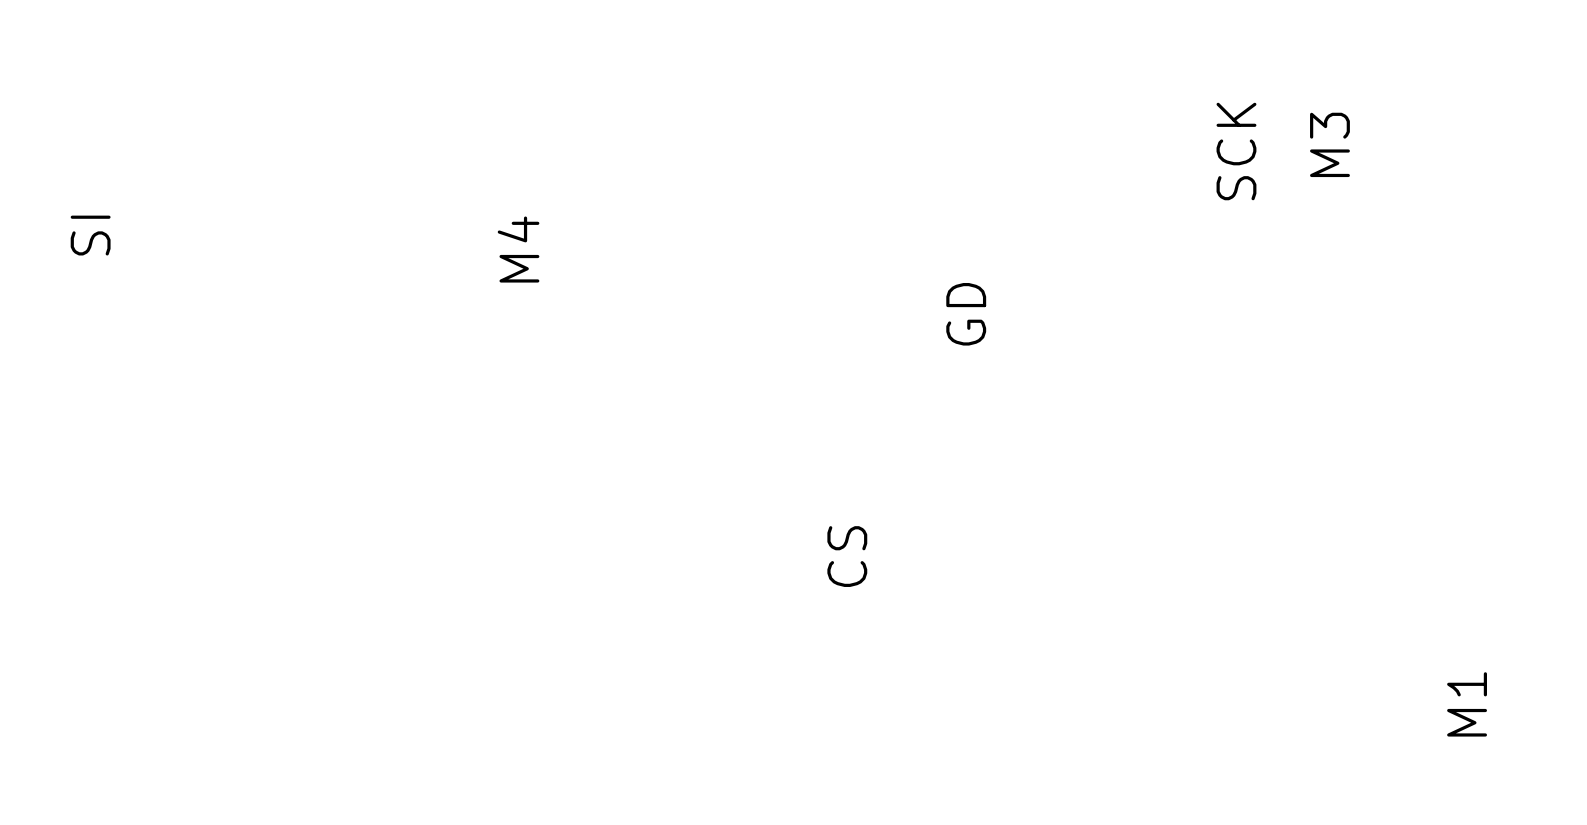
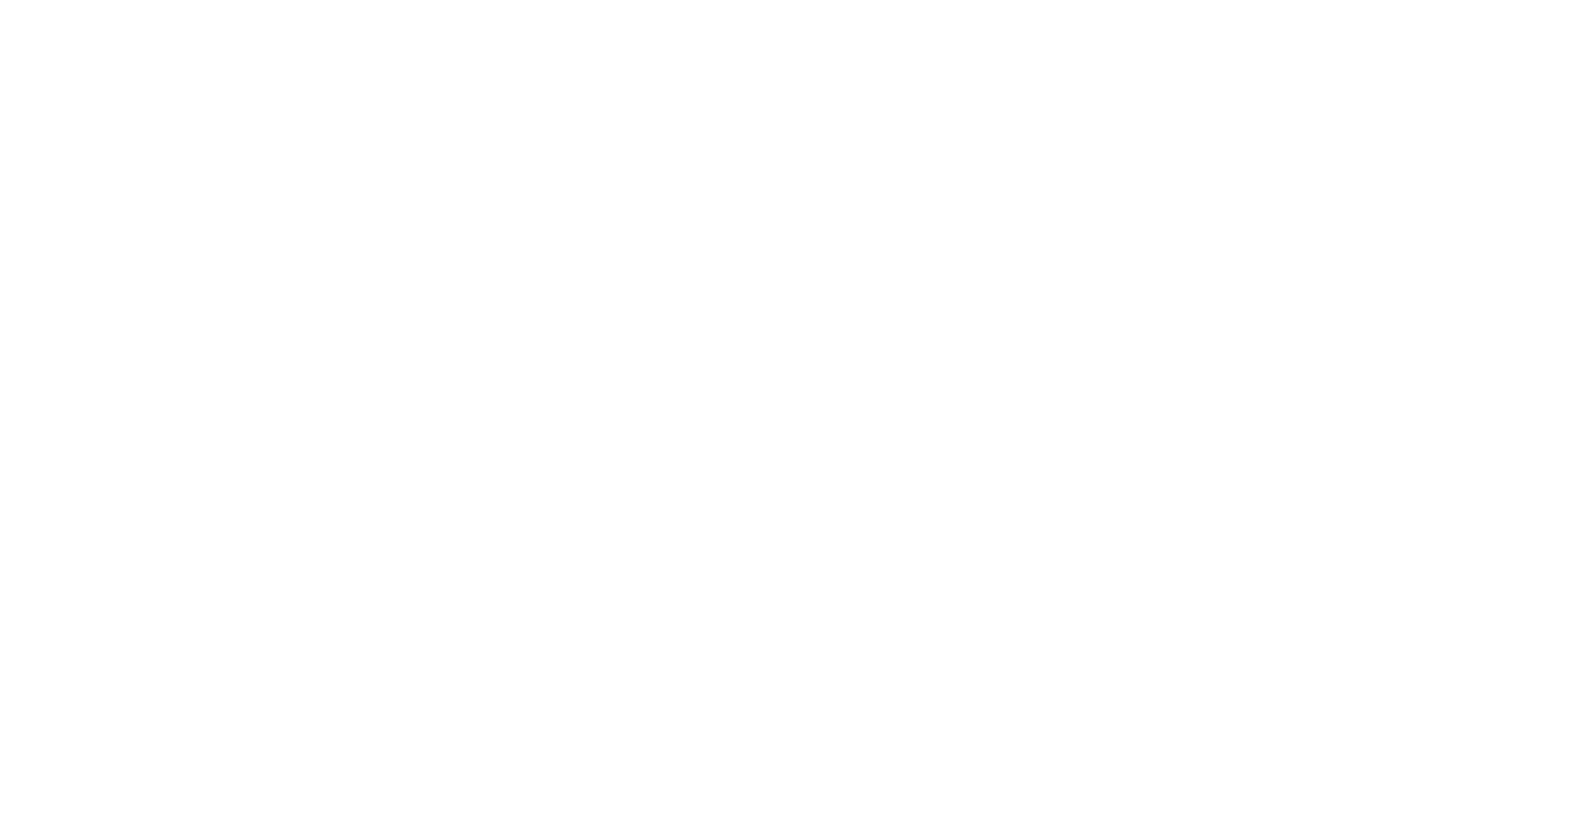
text: M3 (1329, 144) -> none
text: SCK (1236, 151) -> none
text: SI (90, 235) -> none
text: M4 (518, 249) -> none
text: GD (966, 314) -> none
text: CS (847, 556) -> none
text: M1 (1467, 704) -> none

